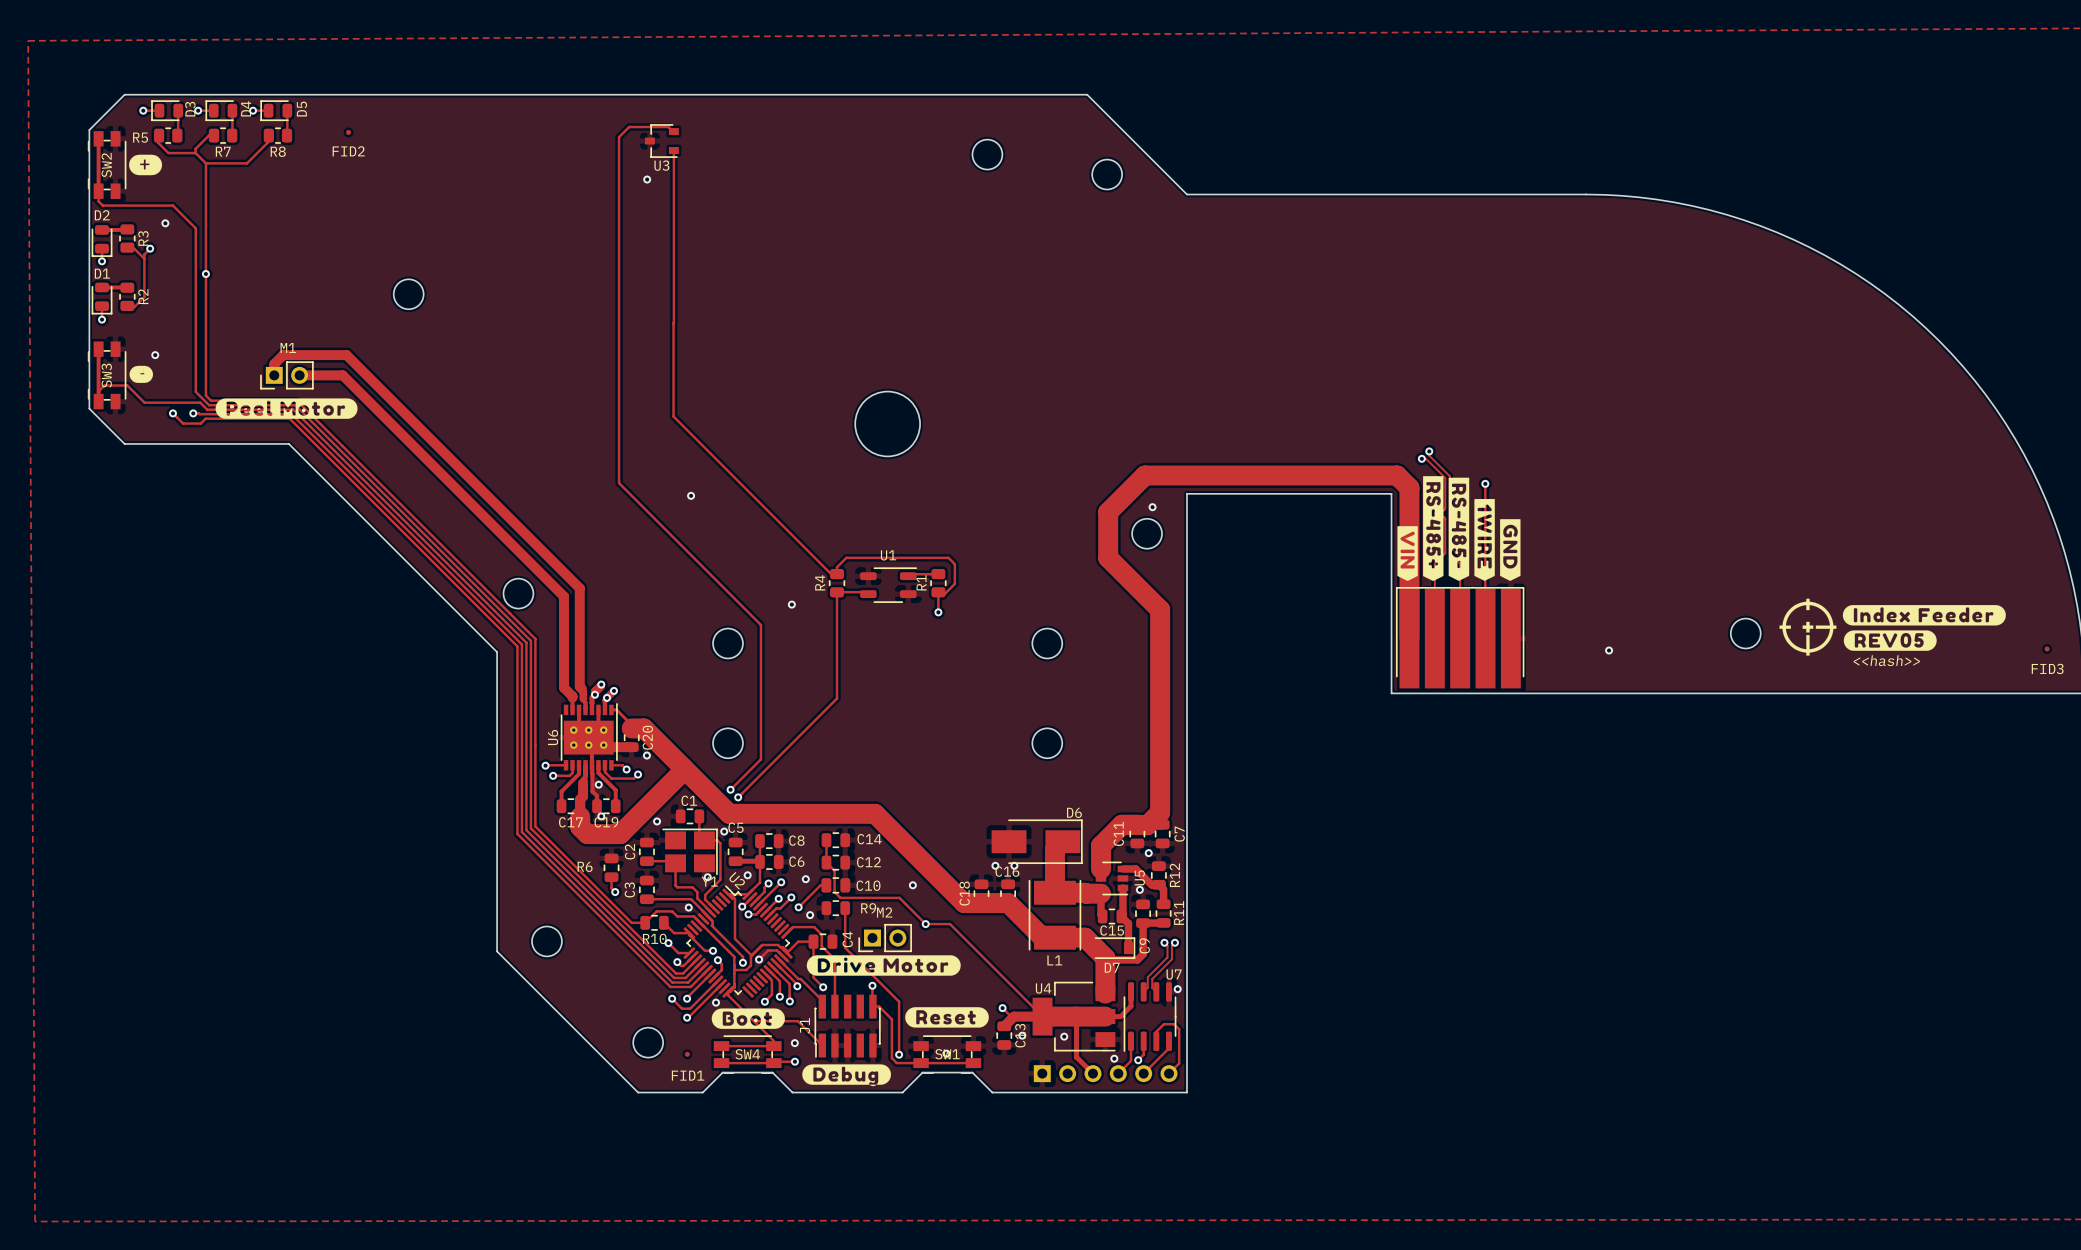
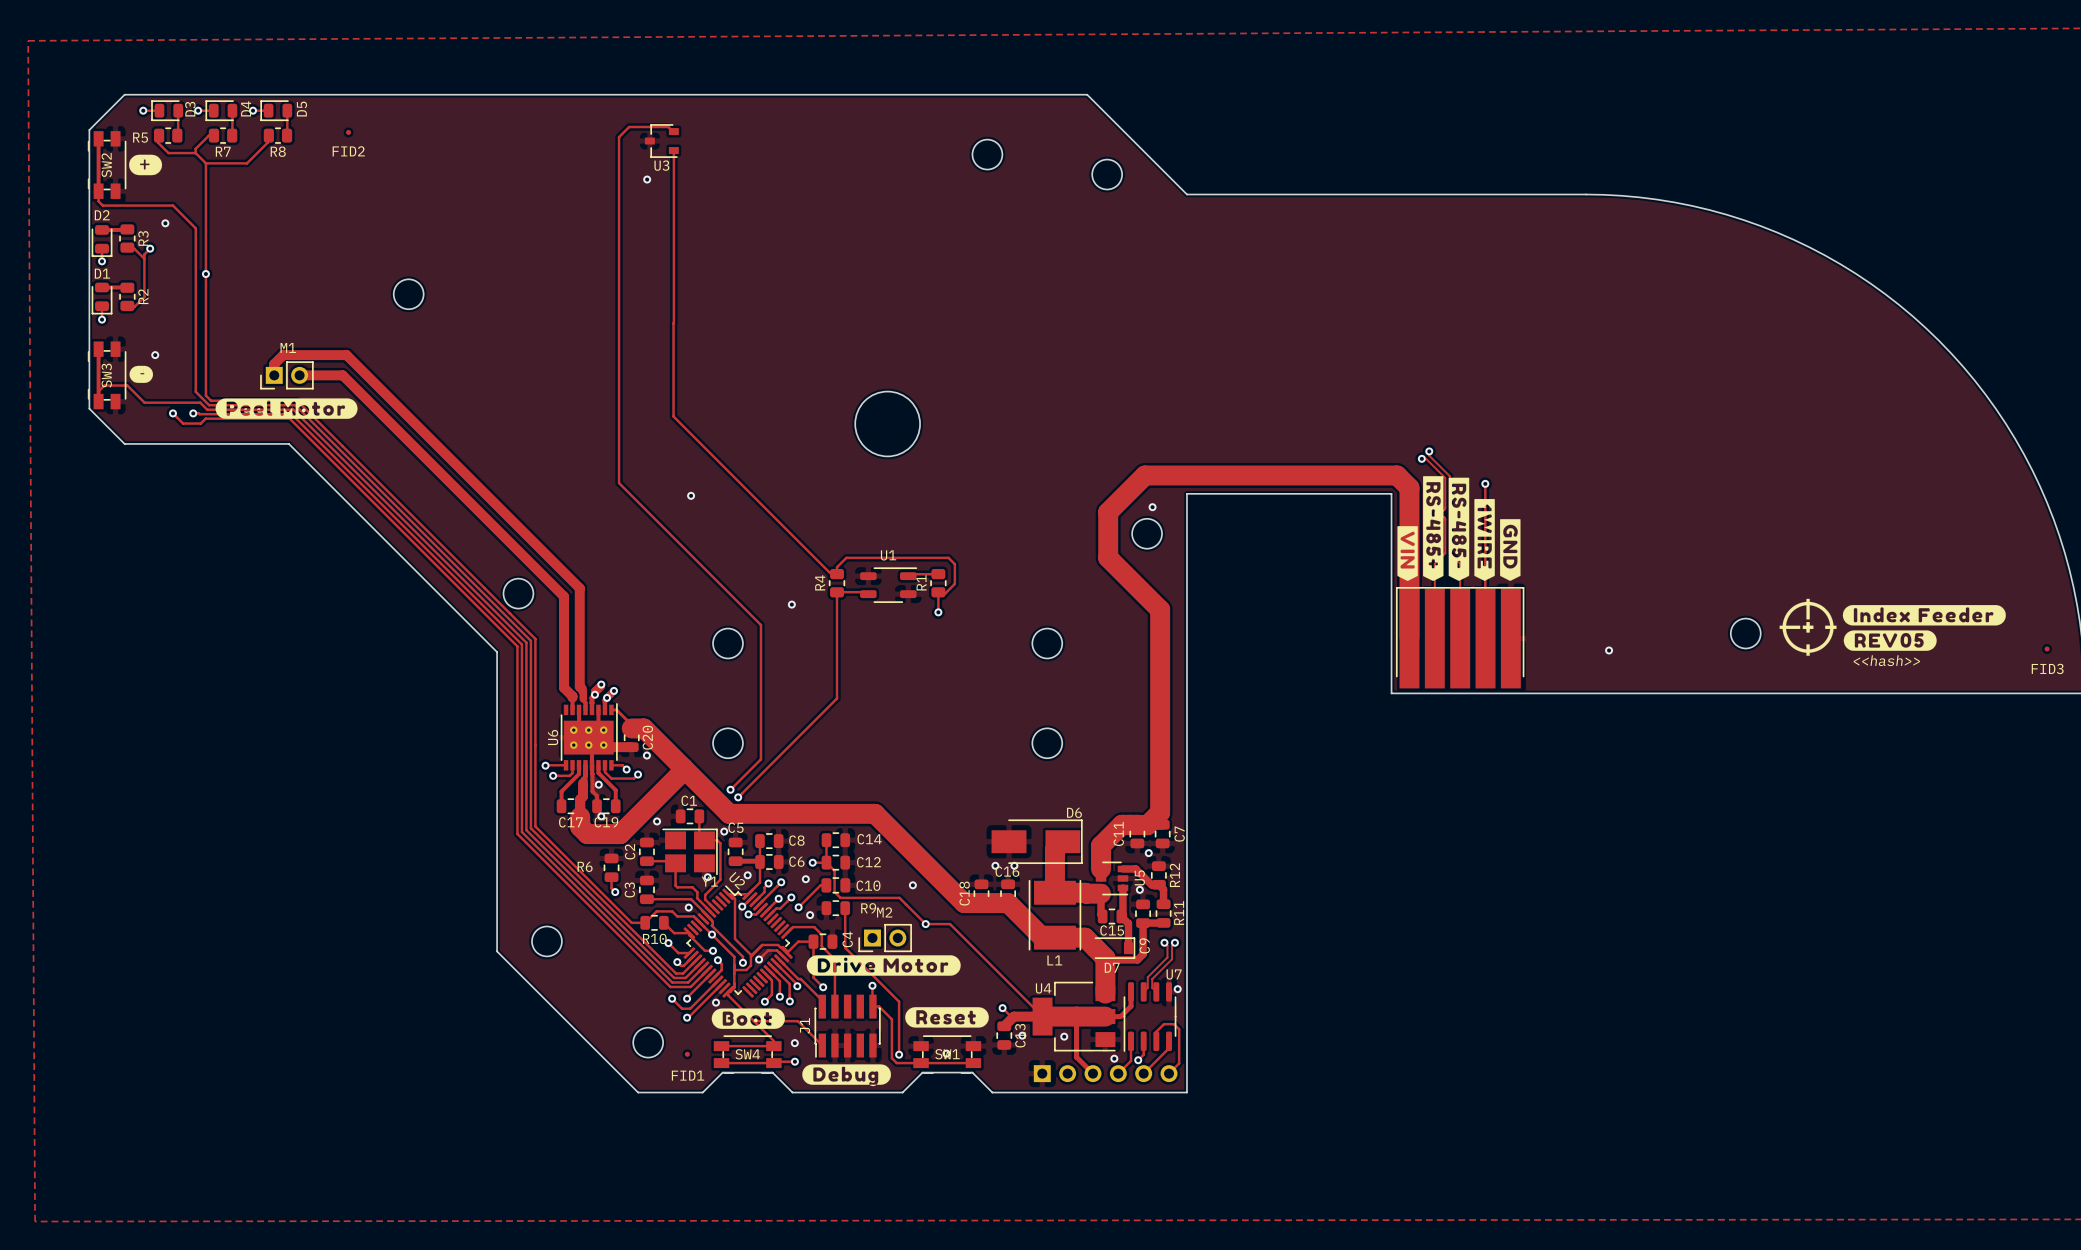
drawing shape: [1779, 598, 1837, 656] -> [1779, 598, 1837, 656]
track: none -> (812, 862) (826, 862)
via: none -> (812, 862)
via: none -> (712, 934)

